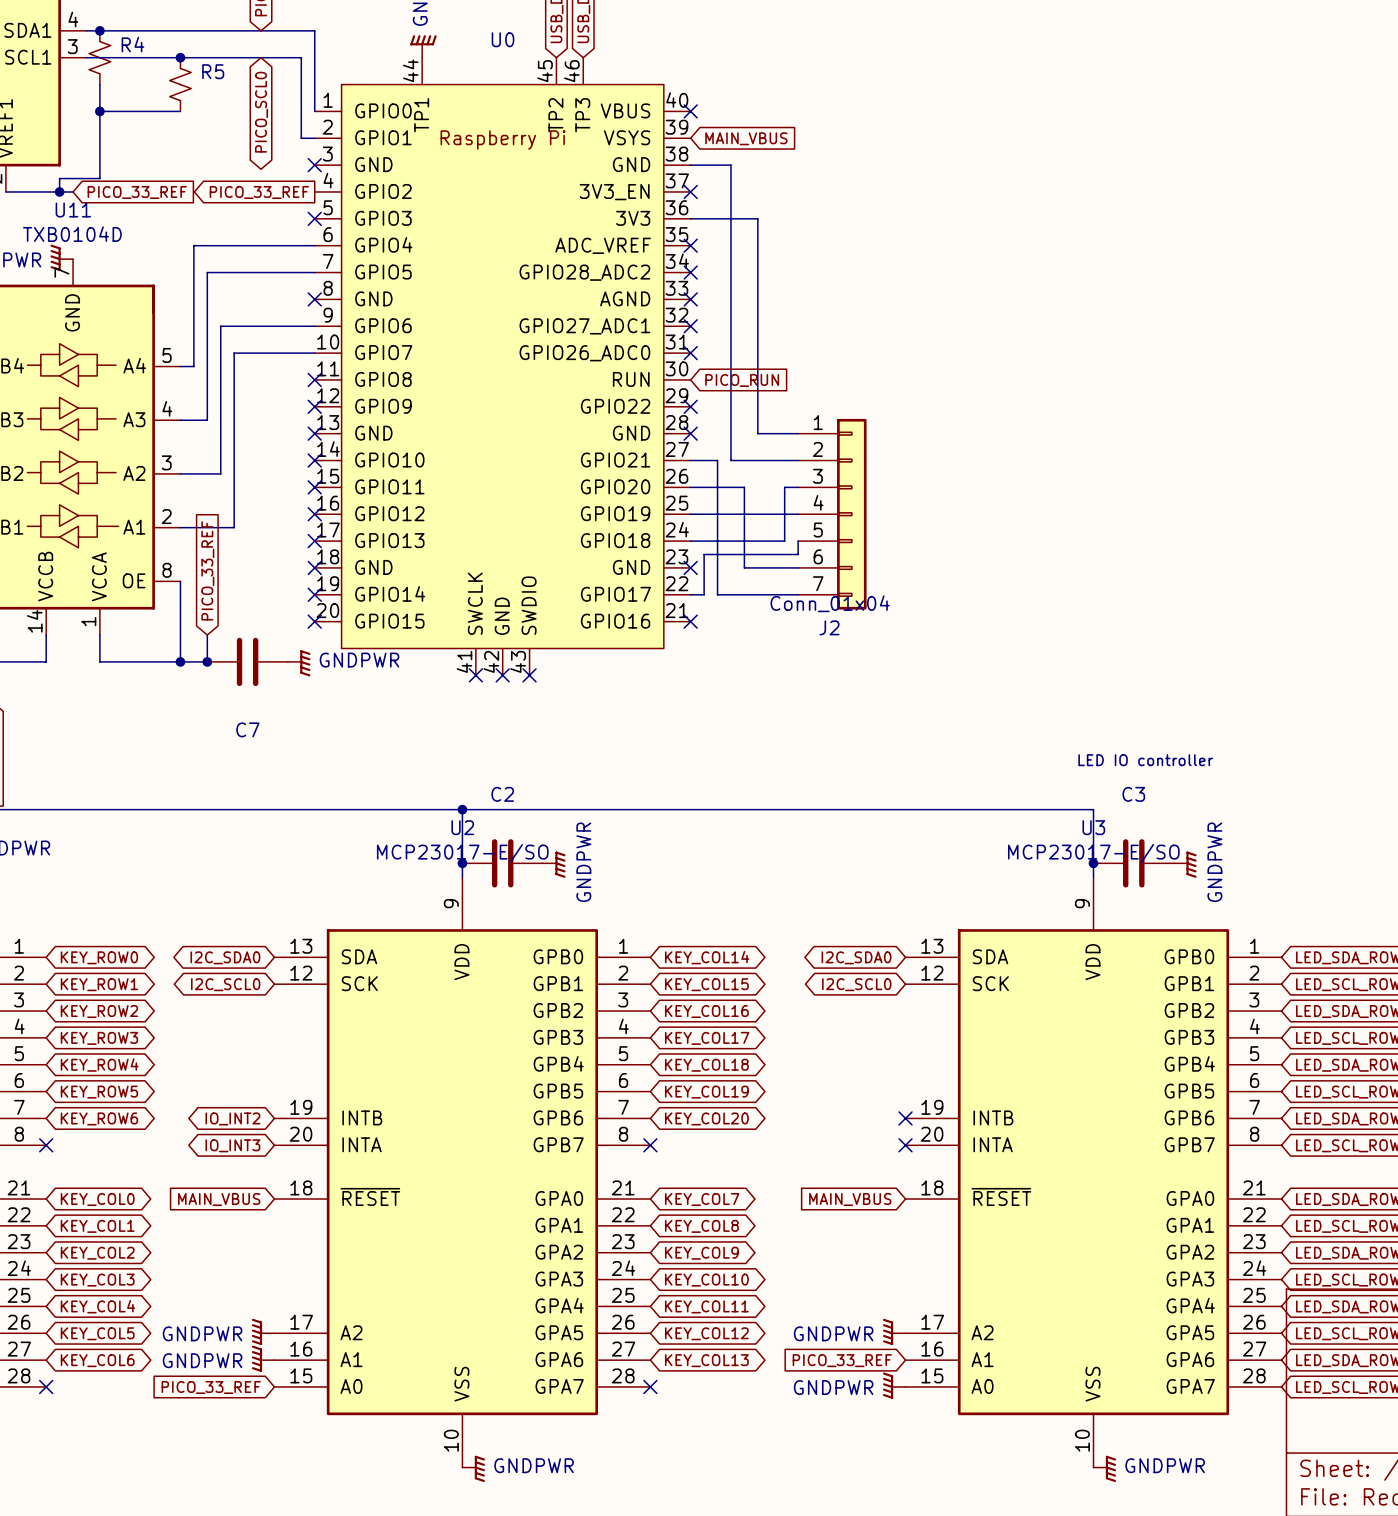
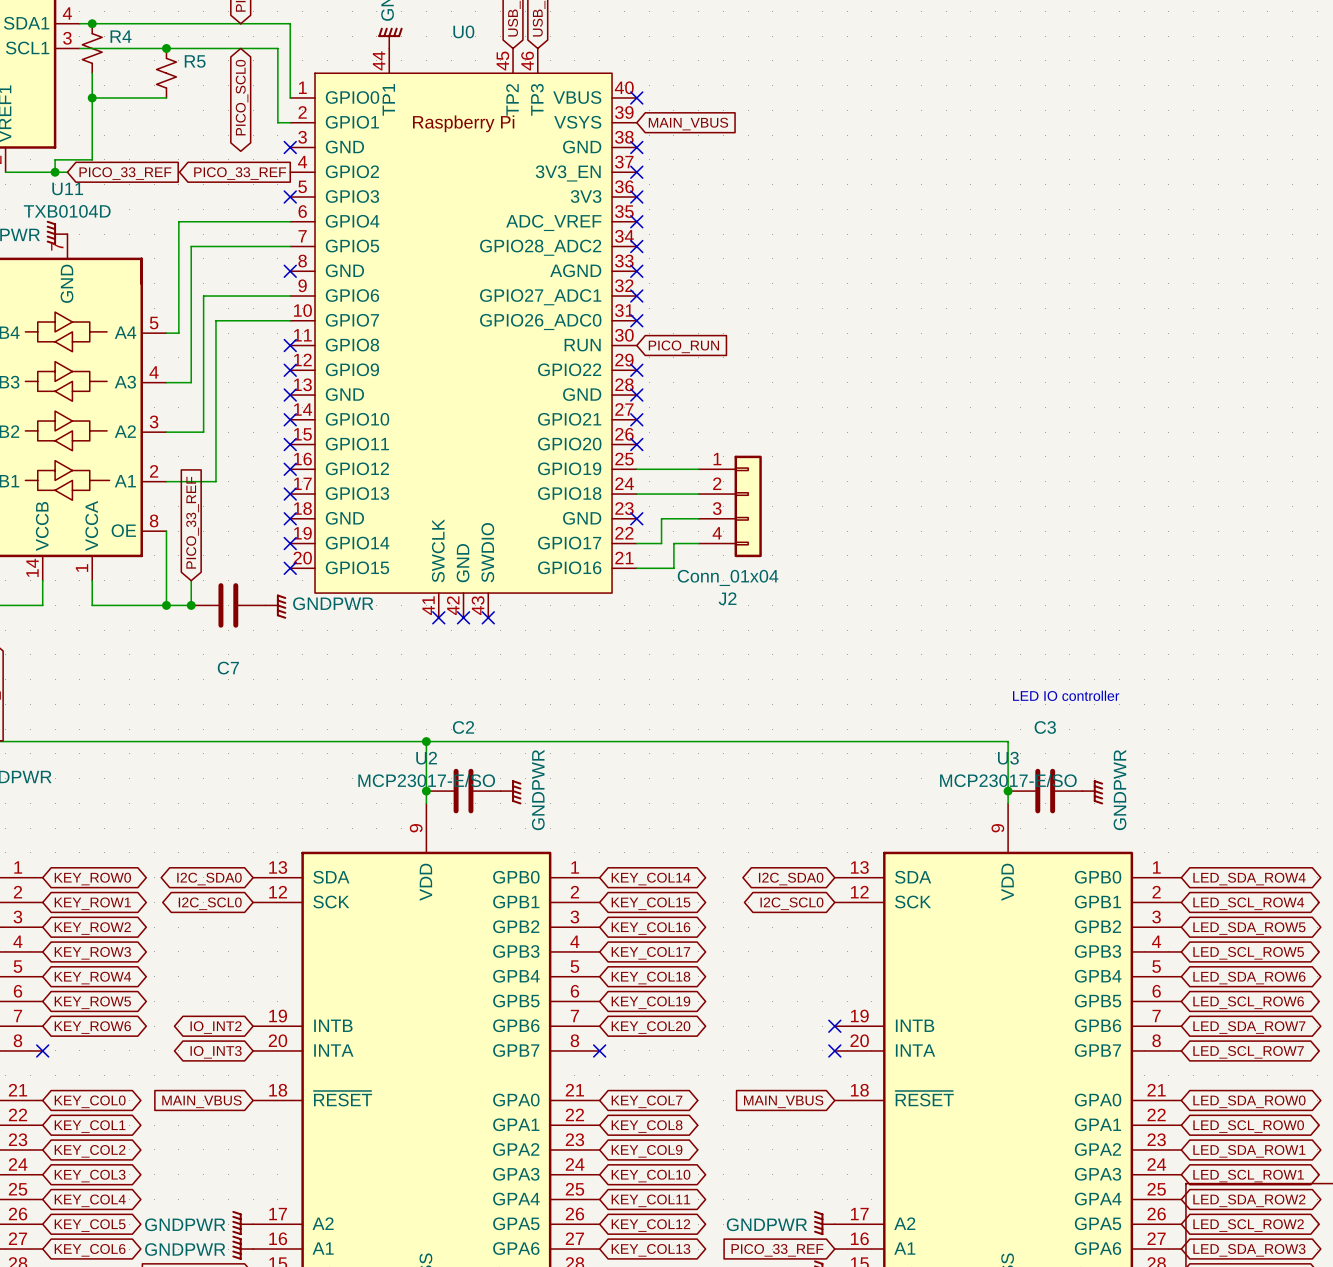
wire: (690, 165) (730, 165) (730, 460) (798, 460) -> none
no-connect mark: none -> (636, 147)
wire: (690, 218) (757, 218) (757, 433) (798, 433) -> none
no-connect mark: none -> (636, 197)
J2 symbol: [798, 418, 867, 610] -> [698, 455, 762, 558]
wire: (690, 460) (717, 460) (717, 567) -> none
no-connect mark: none -> (636, 419)
wire: (690, 487) (744, 487) (744, 567) -> (661, 518) (686, 518)
no-connect mark: none -> (636, 444)
wire: (798, 487) (784, 487) (784, 541) (757, 541) -> none
wire: (798, 541) (798, 554) (704, 554) (704, 594) -> none
wire: (717, 594) (730, 594) -> (661, 543) (649, 543)
wire: none -> (673, 543) (673, 568) (636, 568)
no-connect mark: (690, 621) -> none

